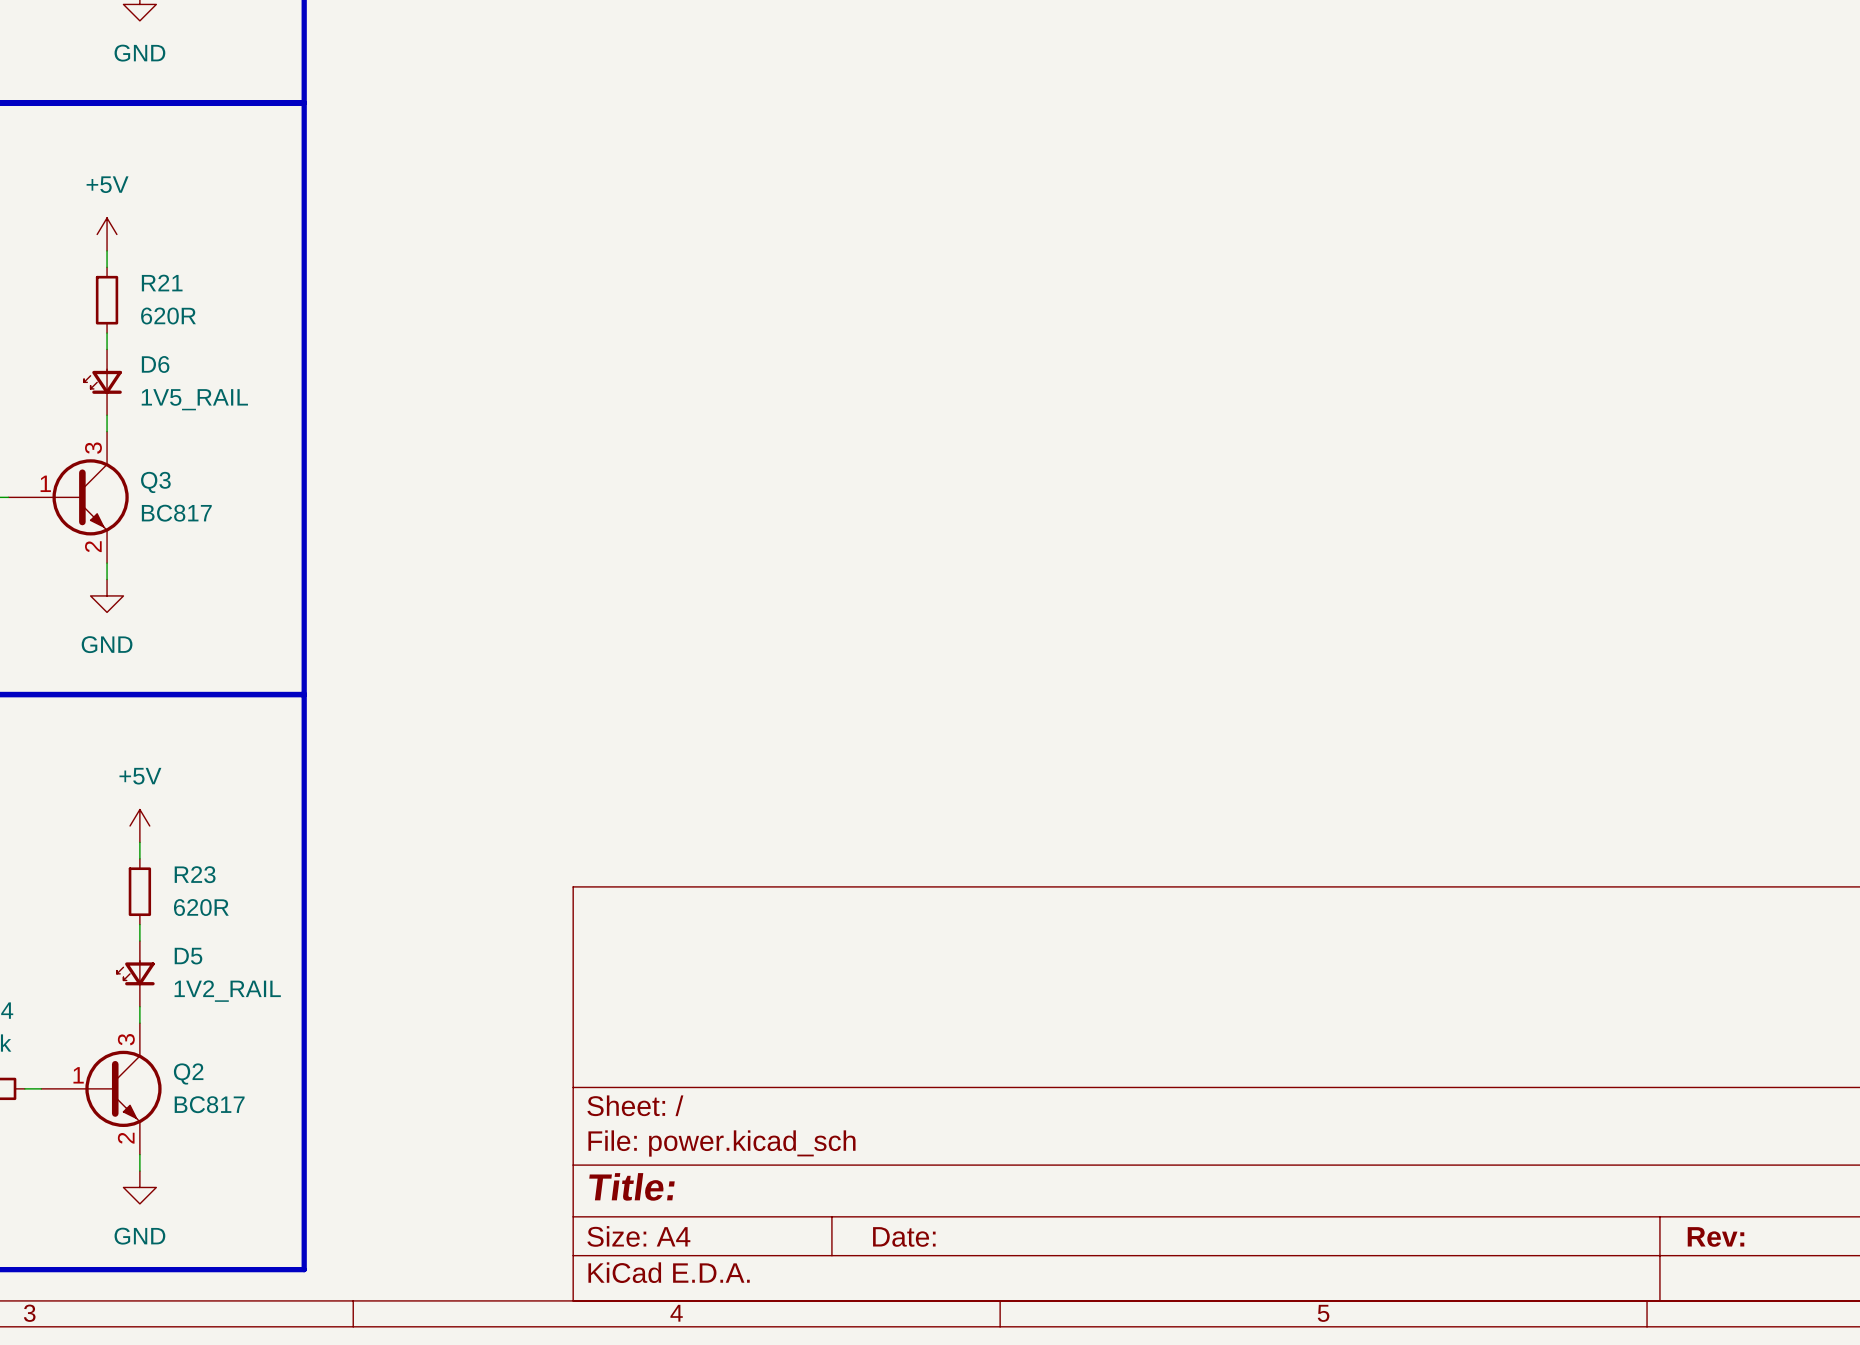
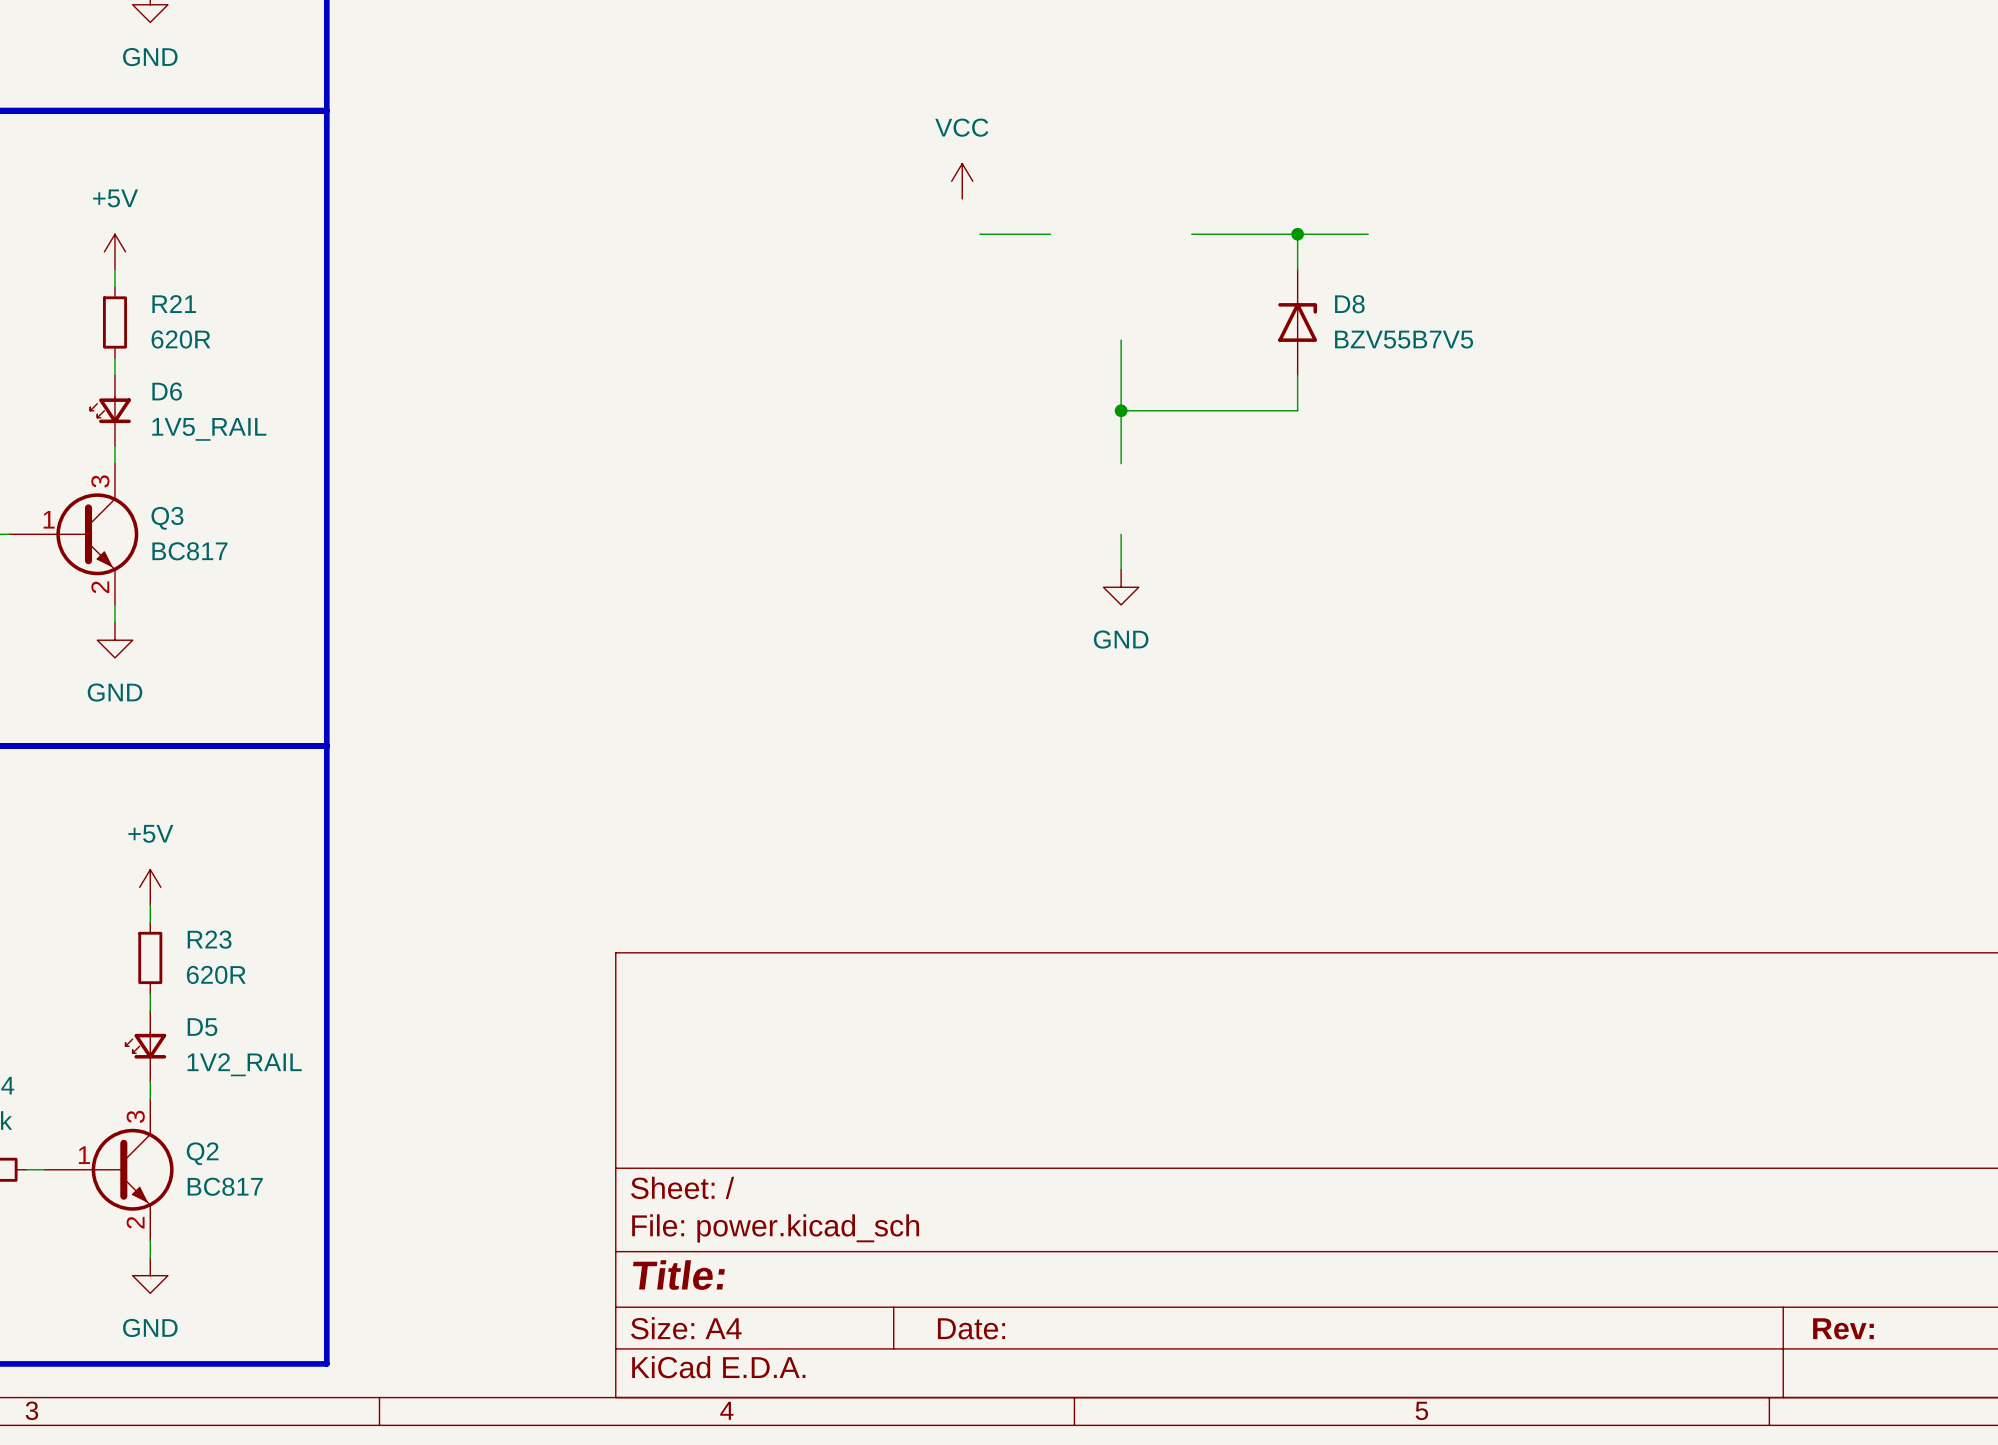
power symbol: none -> VCC (962, 181)
wire: none -> (979, 234) (1050, 234)
wire: none -> (1191, 234) (1368, 234)
wire: none -> (1297, 234) (1297, 269)
junction: none -> (1297, 234)
D8: none -> BZV55B7V5 (1297, 322)
wire: none -> (1121, 340) (1121, 463)
wire: none -> (1297, 375) (1297, 410) (1121, 410)
junction: none -> (1121, 410)
wire: none -> (1121, 534) (1121, 569)
power symbol: none -> GND (1121, 587)

